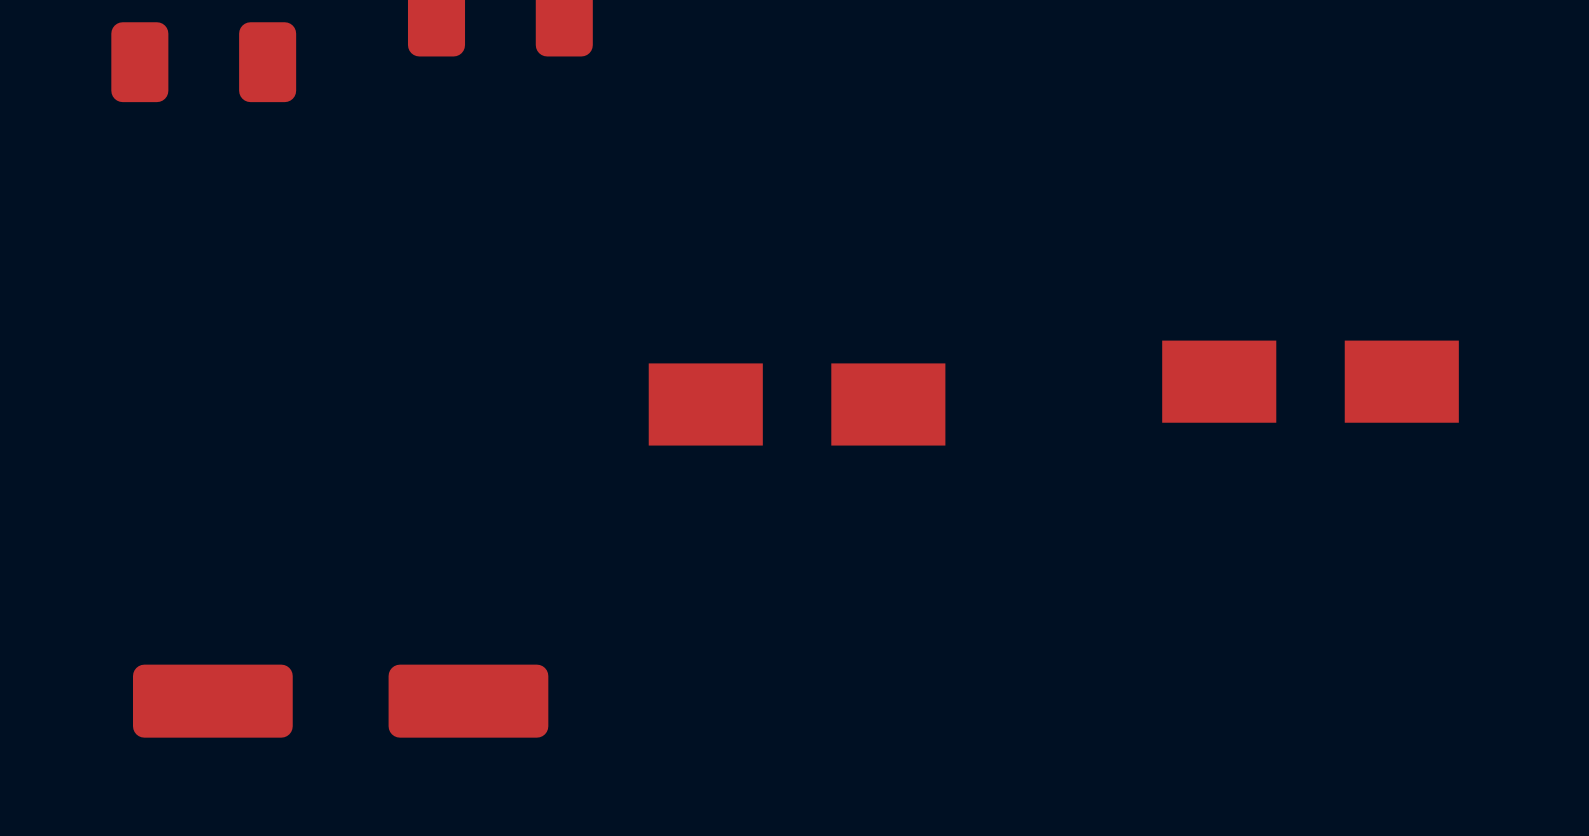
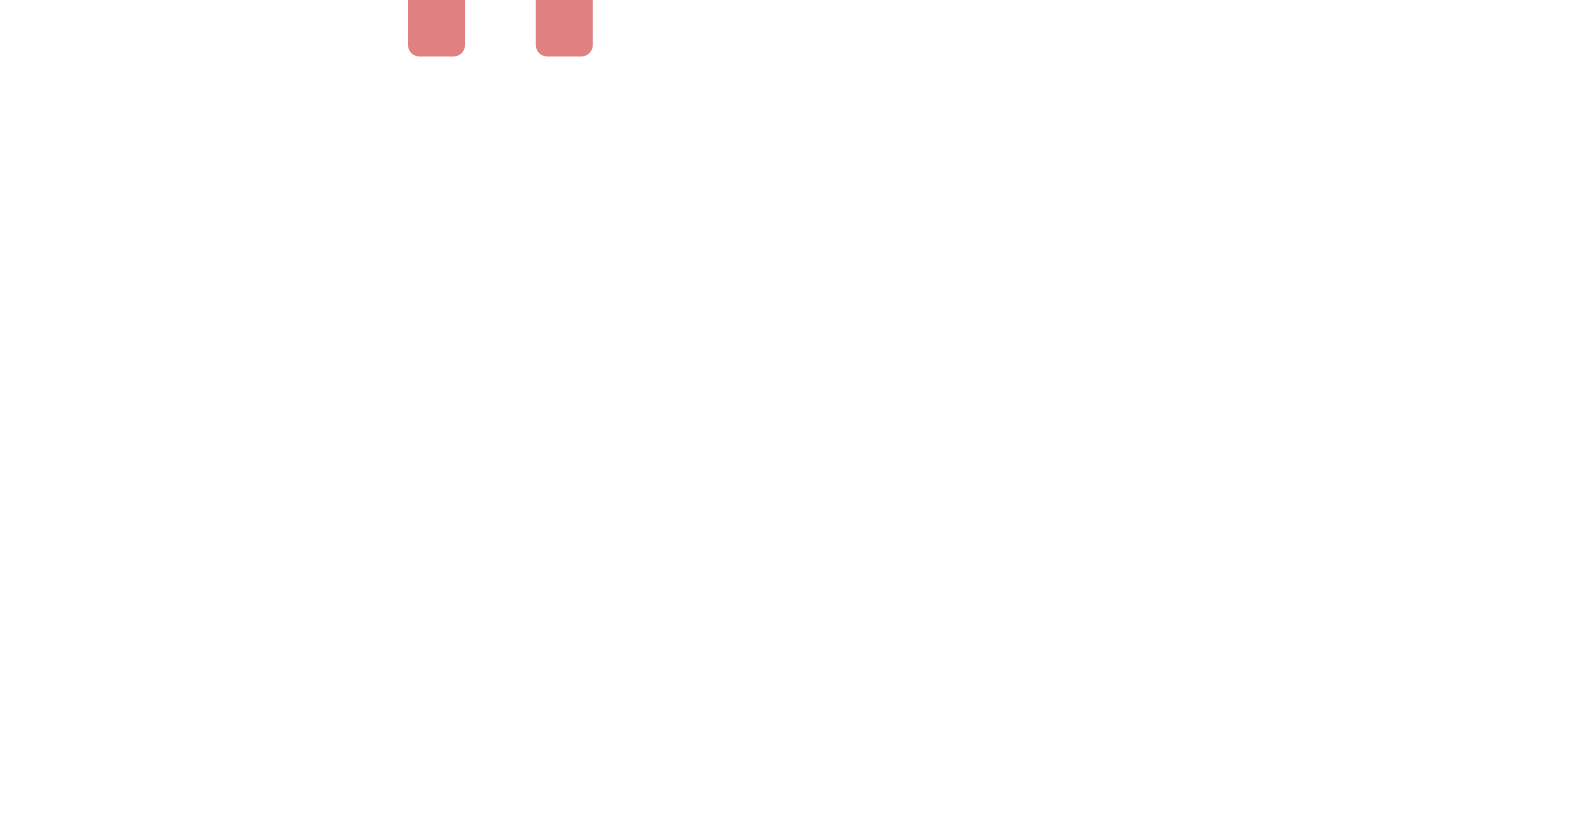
part: (203, 62) -> none
part: (1310, 381) -> none
part: (797, 404) -> none
part: (340, 701) -> none

